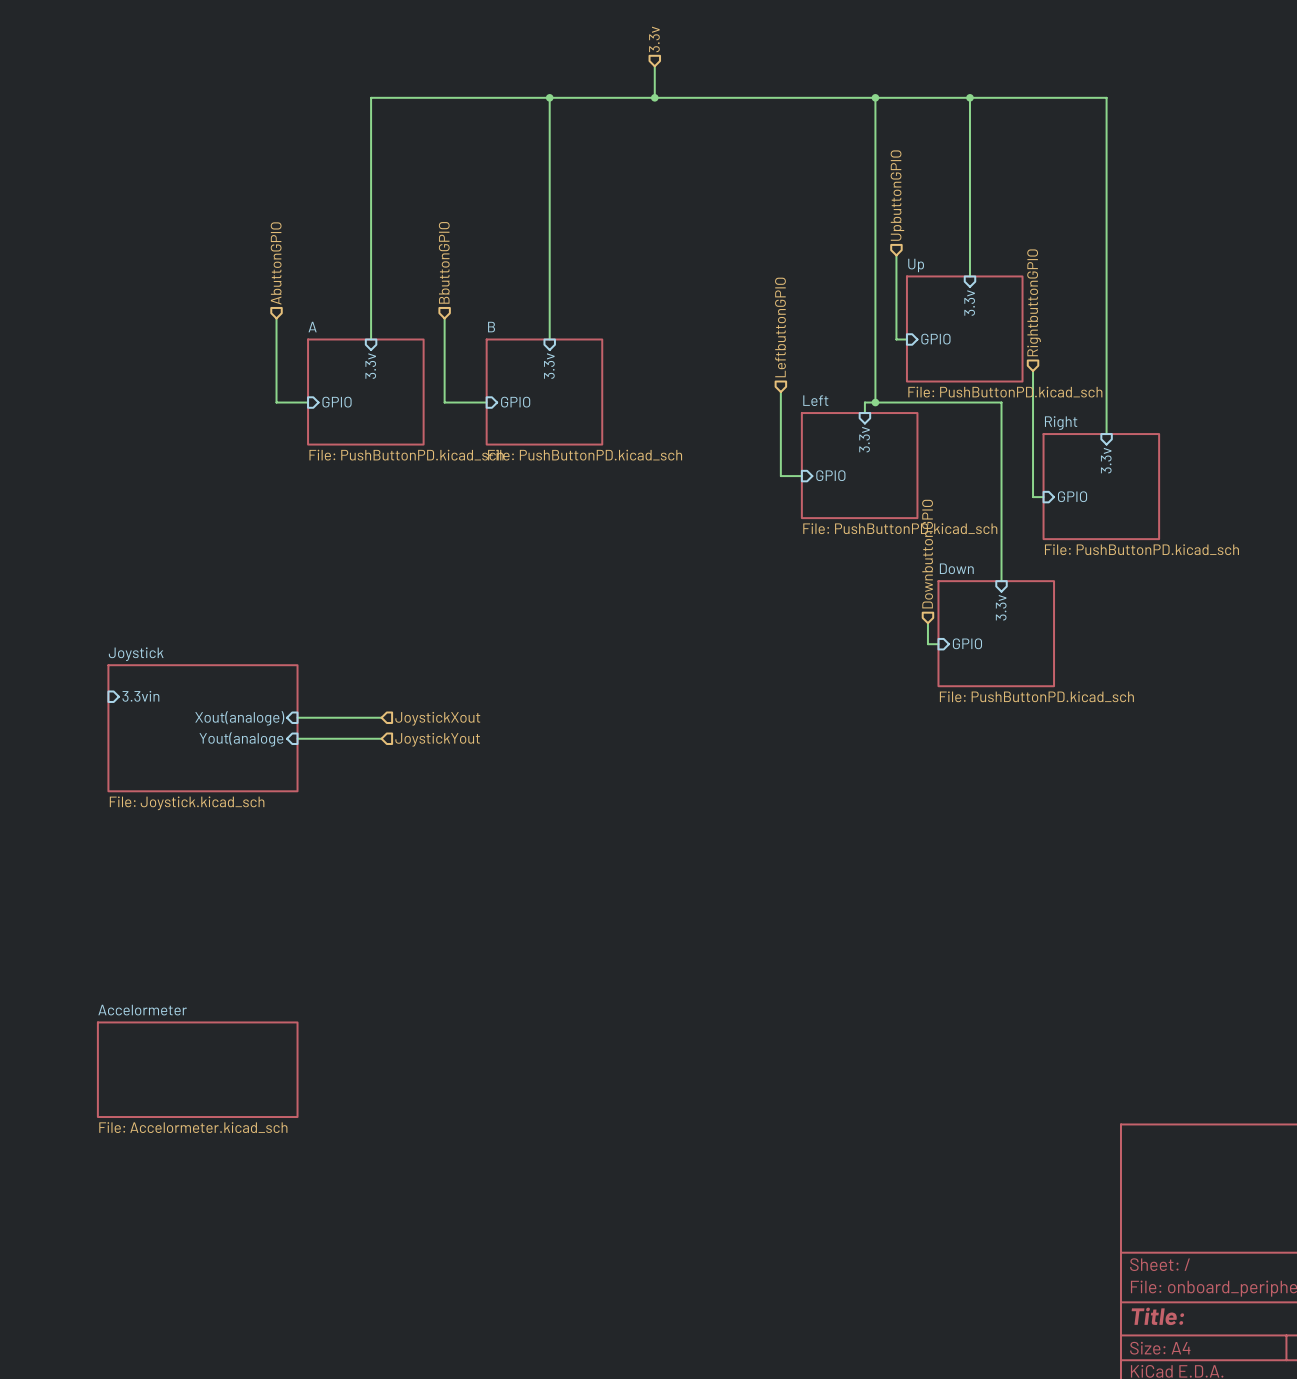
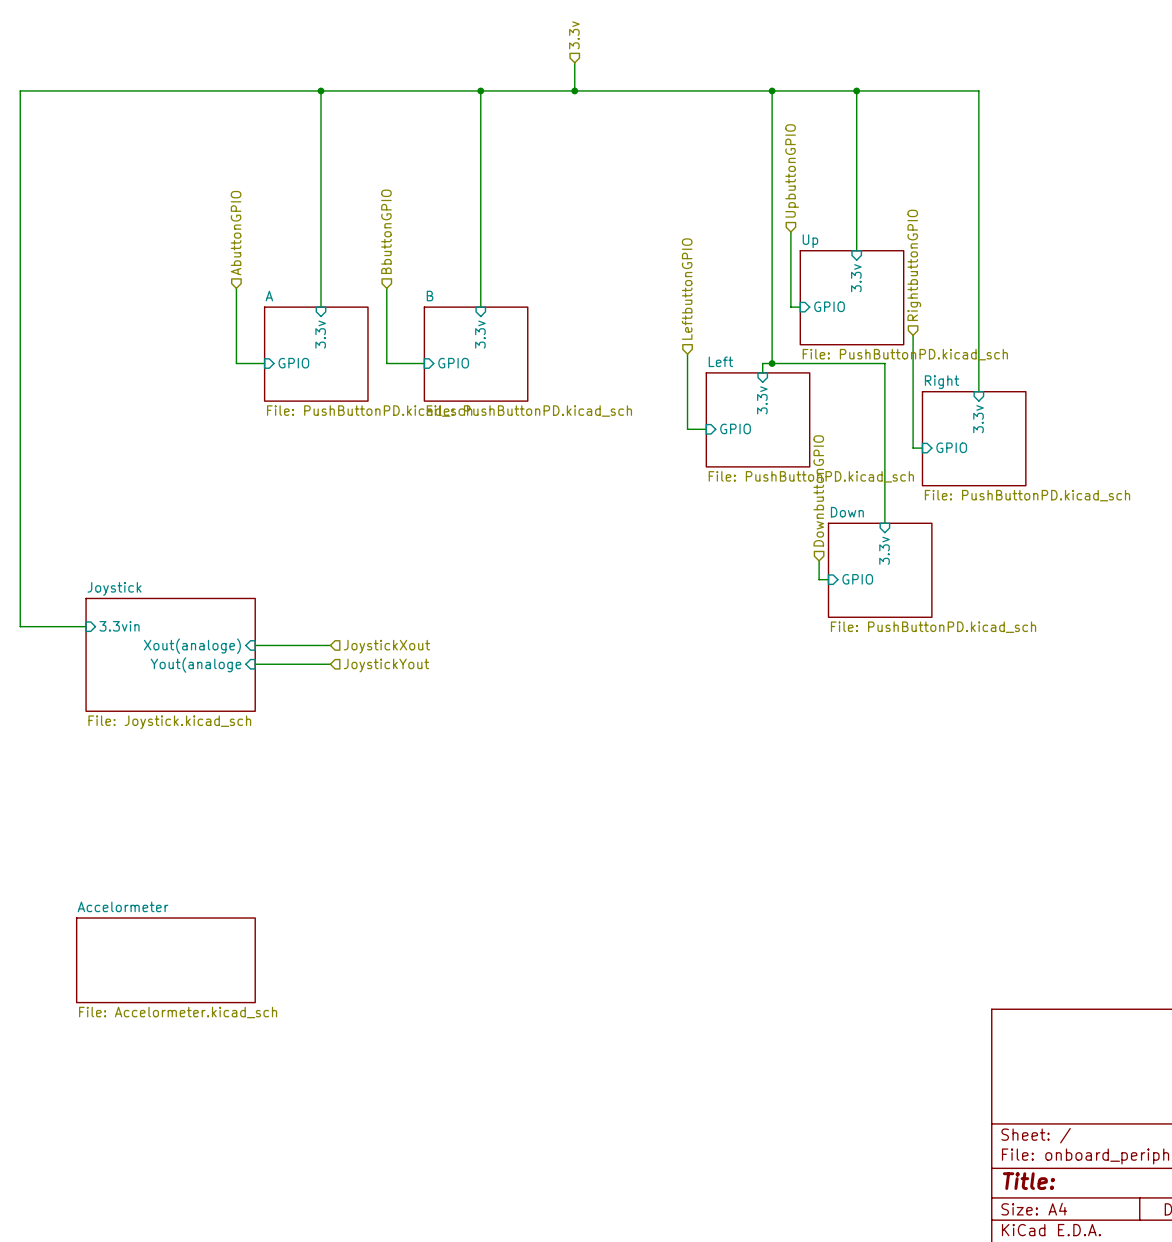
wire: none -> (321, 90) (20, 90) (20, 626) (86, 626)
junction: none -> (321, 90)

